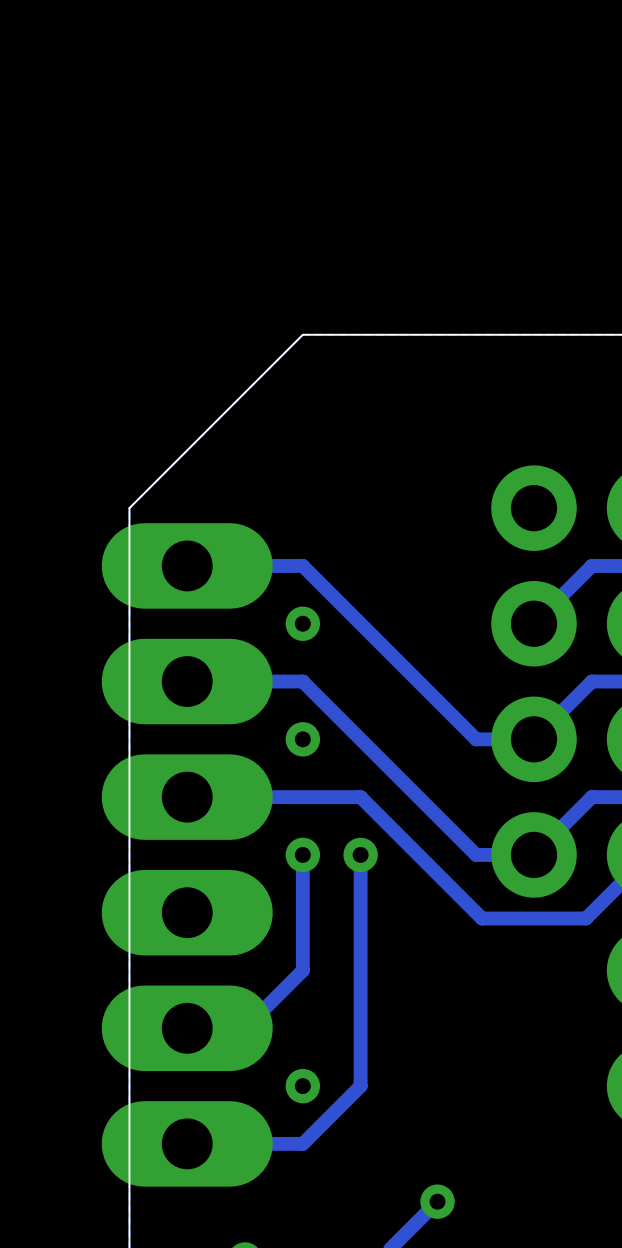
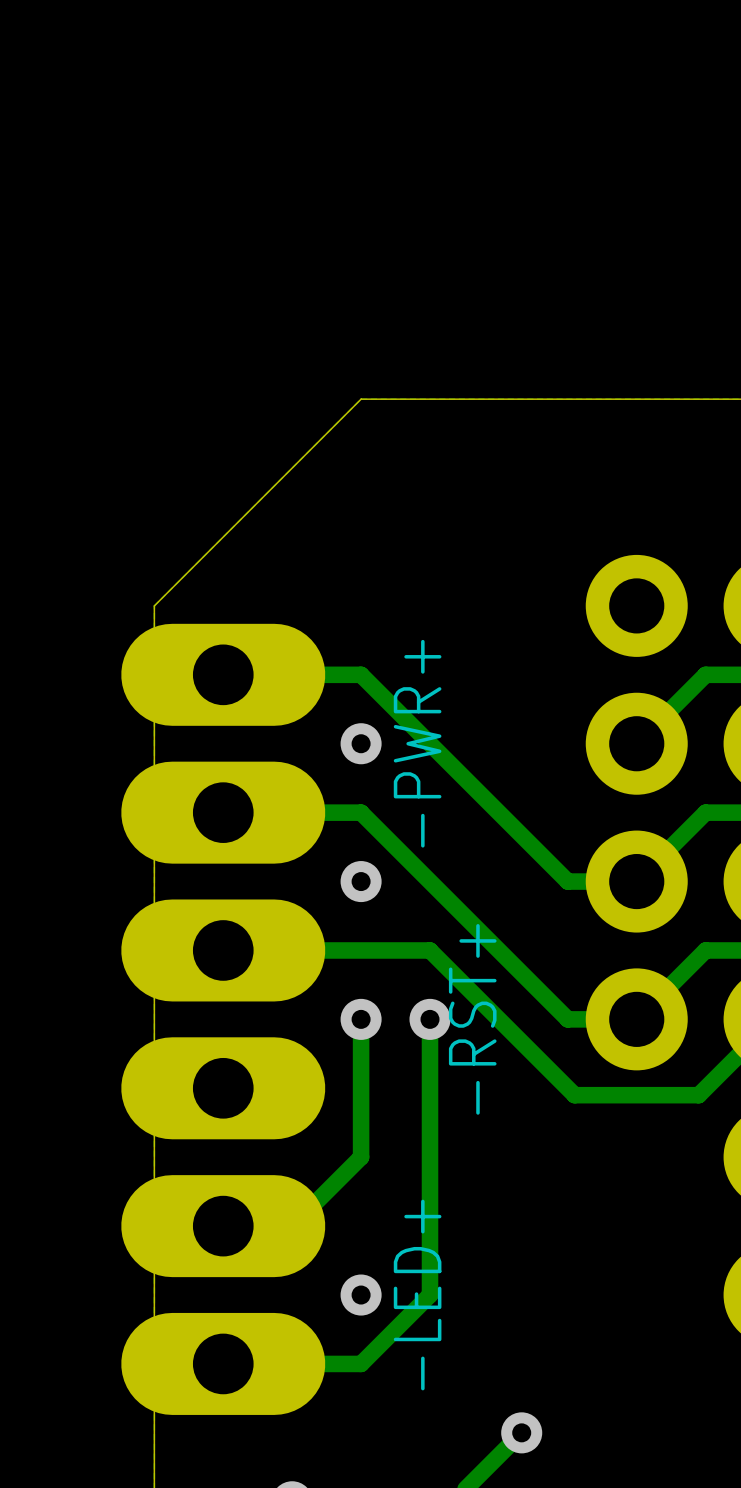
text: none -> -PWR+ (417, 743)
text: none -> -RST+ (472, 1019)
text: none -> -LED+ (417, 1295)

